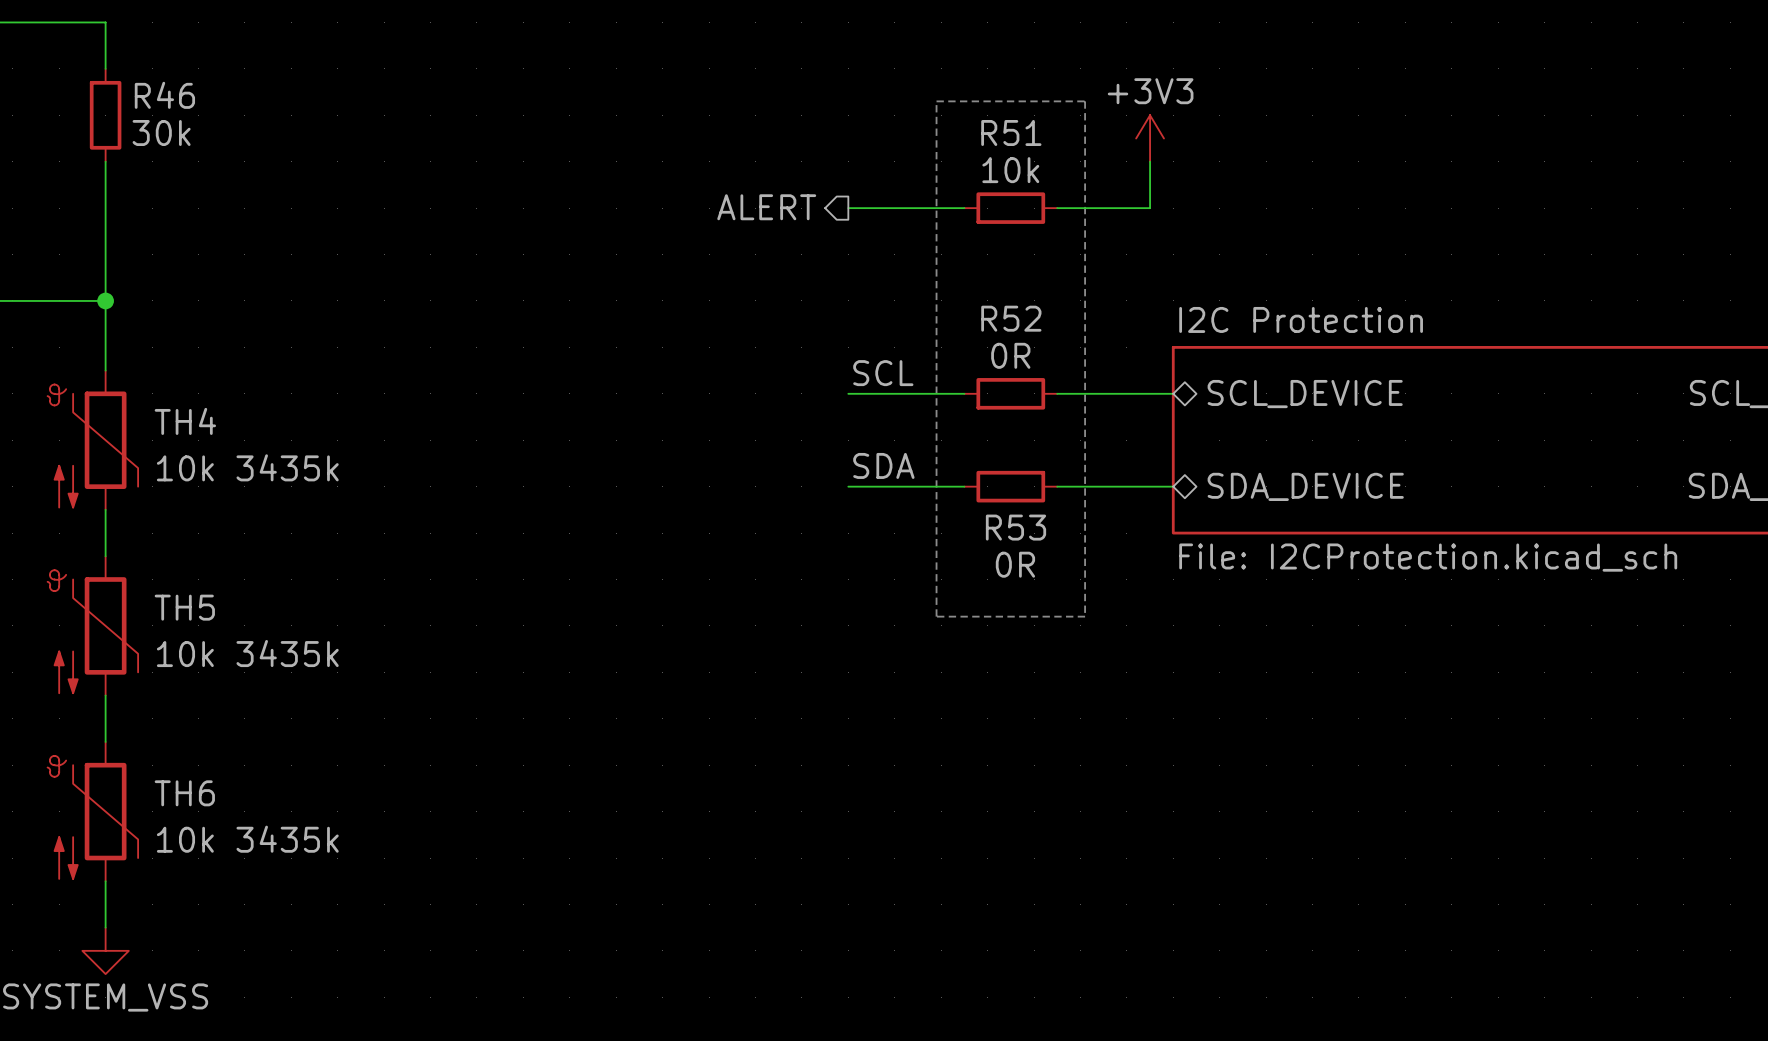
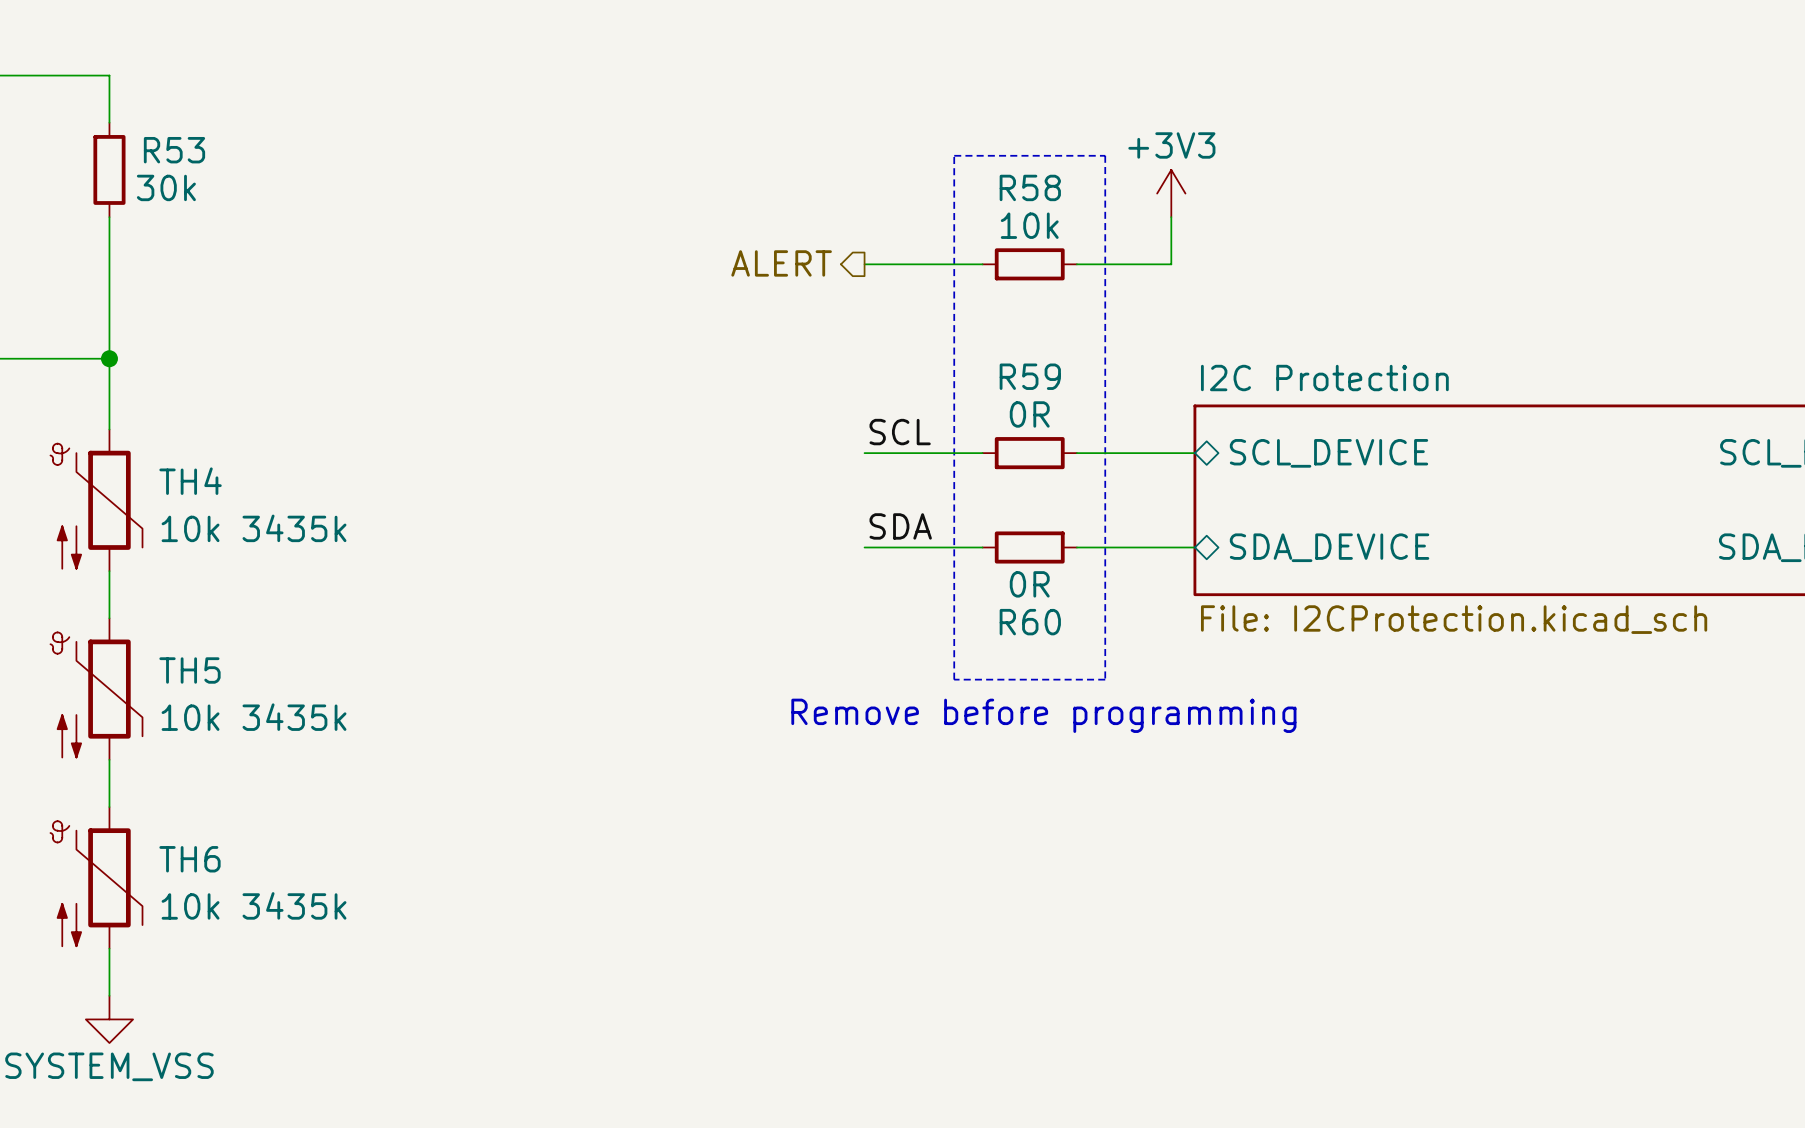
R46 name: R46 (164, 95) -> R53 (174, 150)
R51 name: R51 (1011, 132) -> R58 (1030, 187)
R52 name: R52 (1011, 318) -> R59 (1030, 376)
R53 name: R53 (1015, 527) -> R60 (1030, 622)
R53 value position: 0R (1015, 564) -> 0R (1029, 584)
text: none -> Remove before programming (1043, 715)

